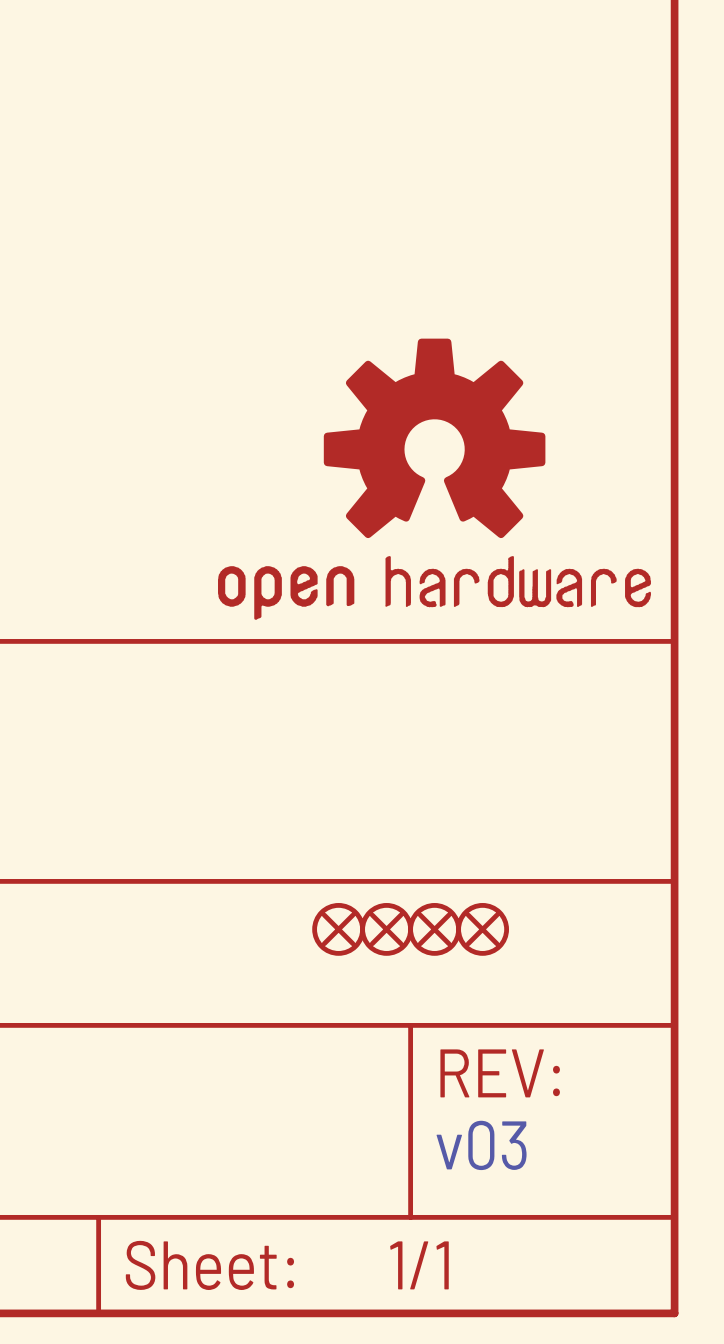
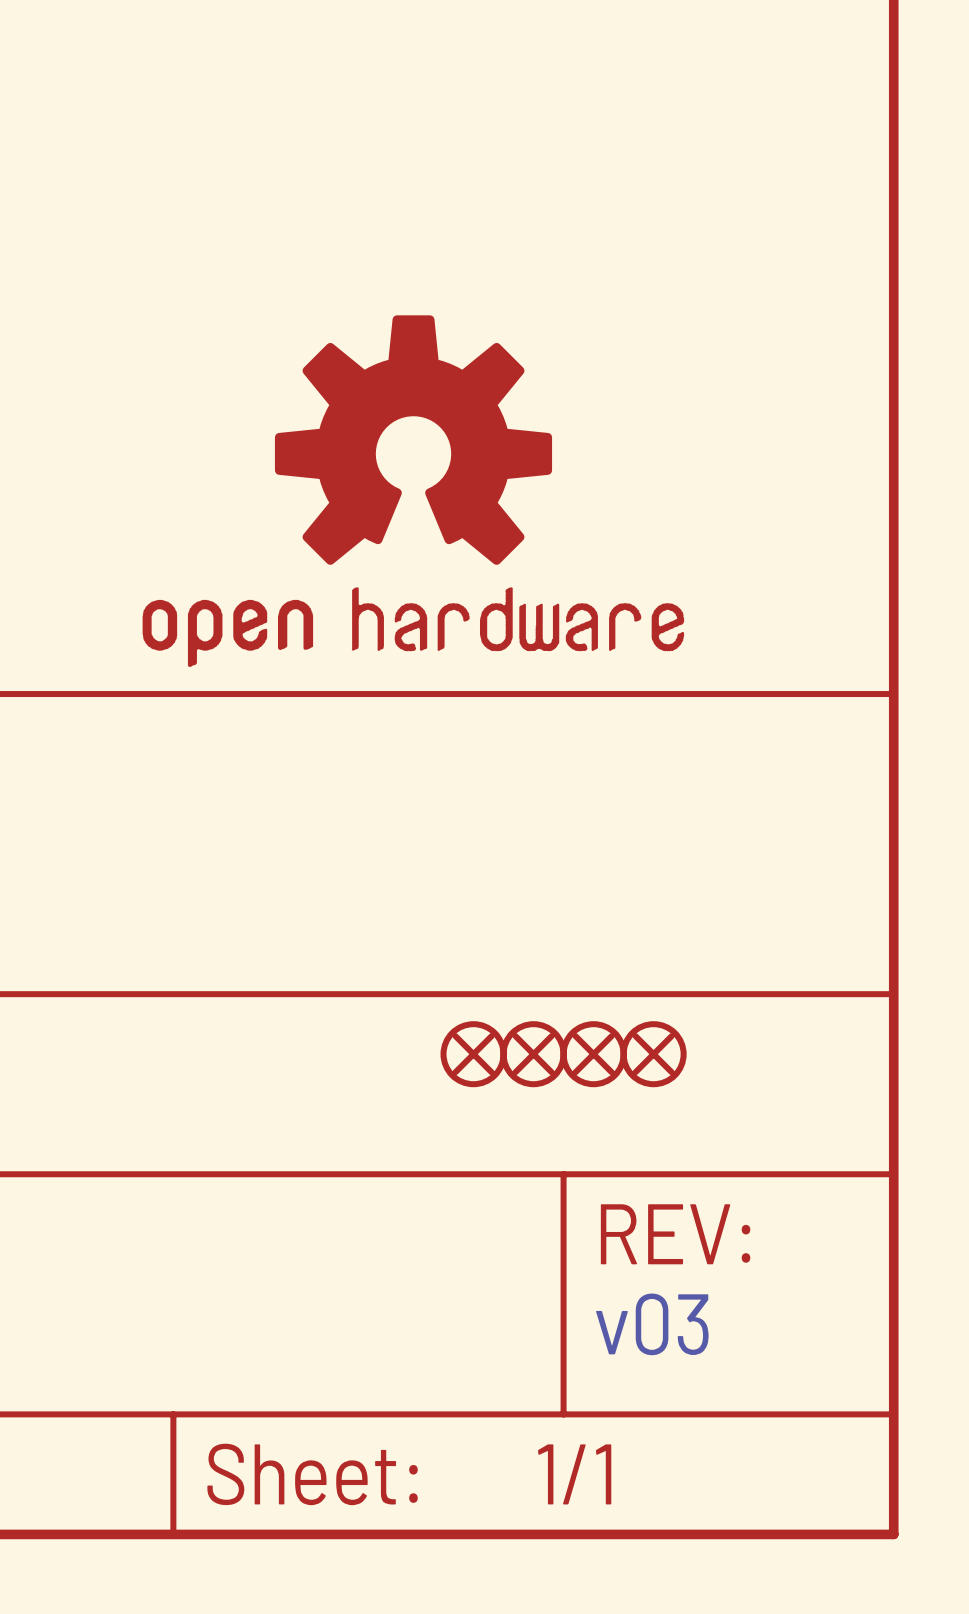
part position: (434, 479) -> (413, 491)

